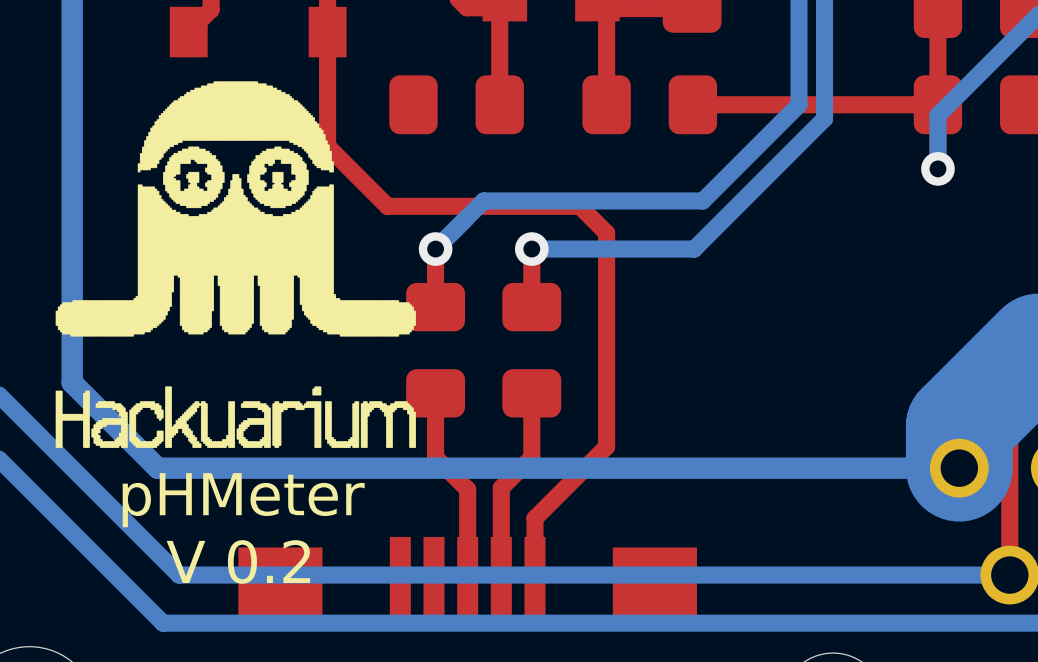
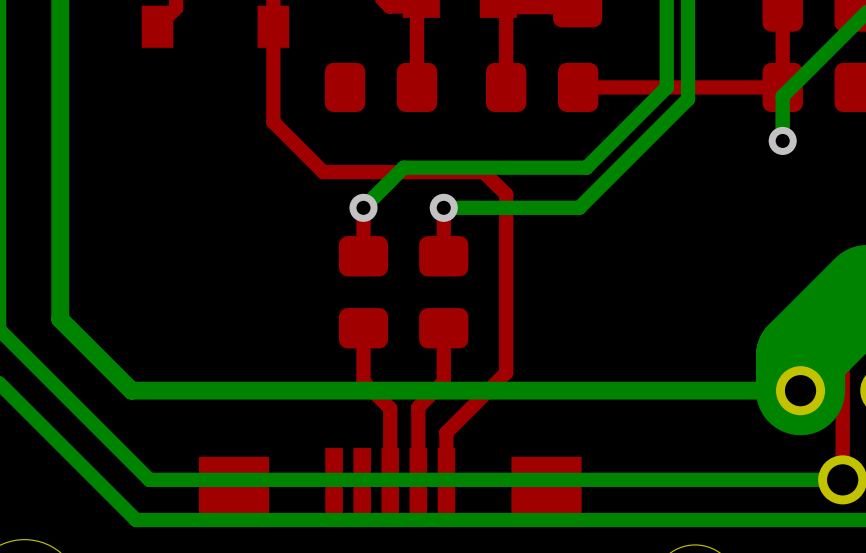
drawing: [55, 81, 416, 448] -> none
text: pHMeter (243, 500) -> none
text: V 0.2 (238, 561) -> none

